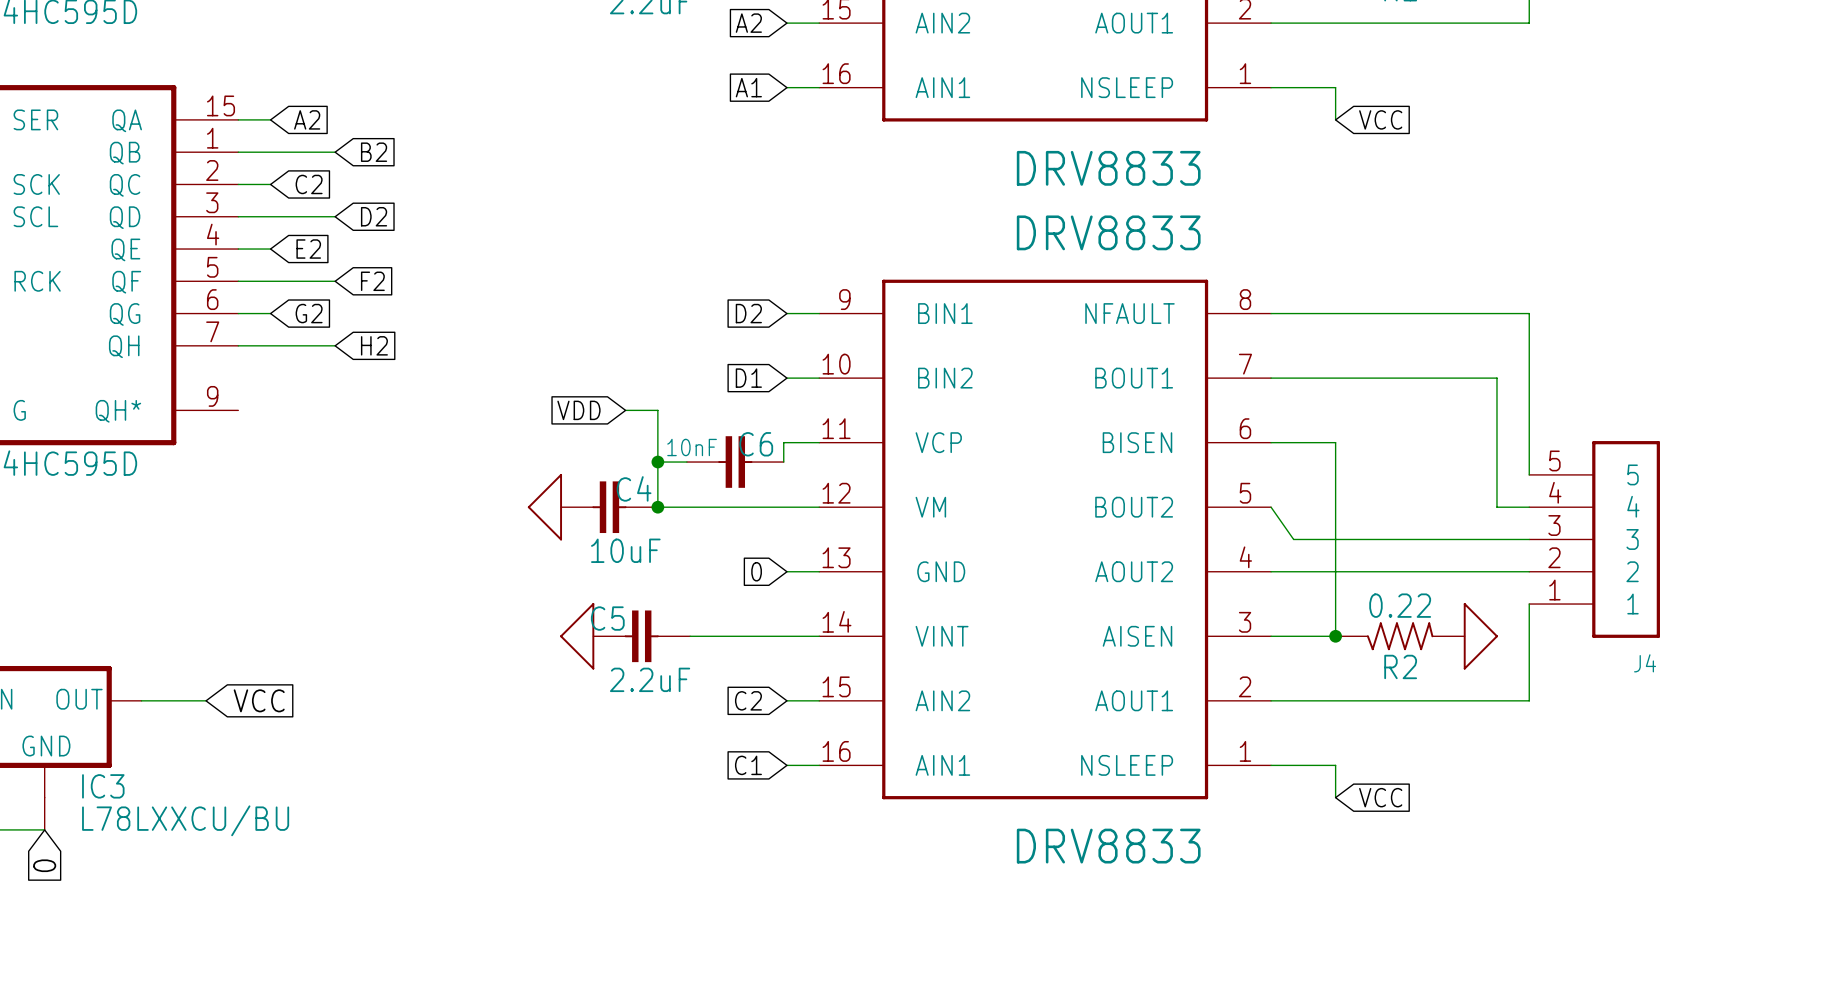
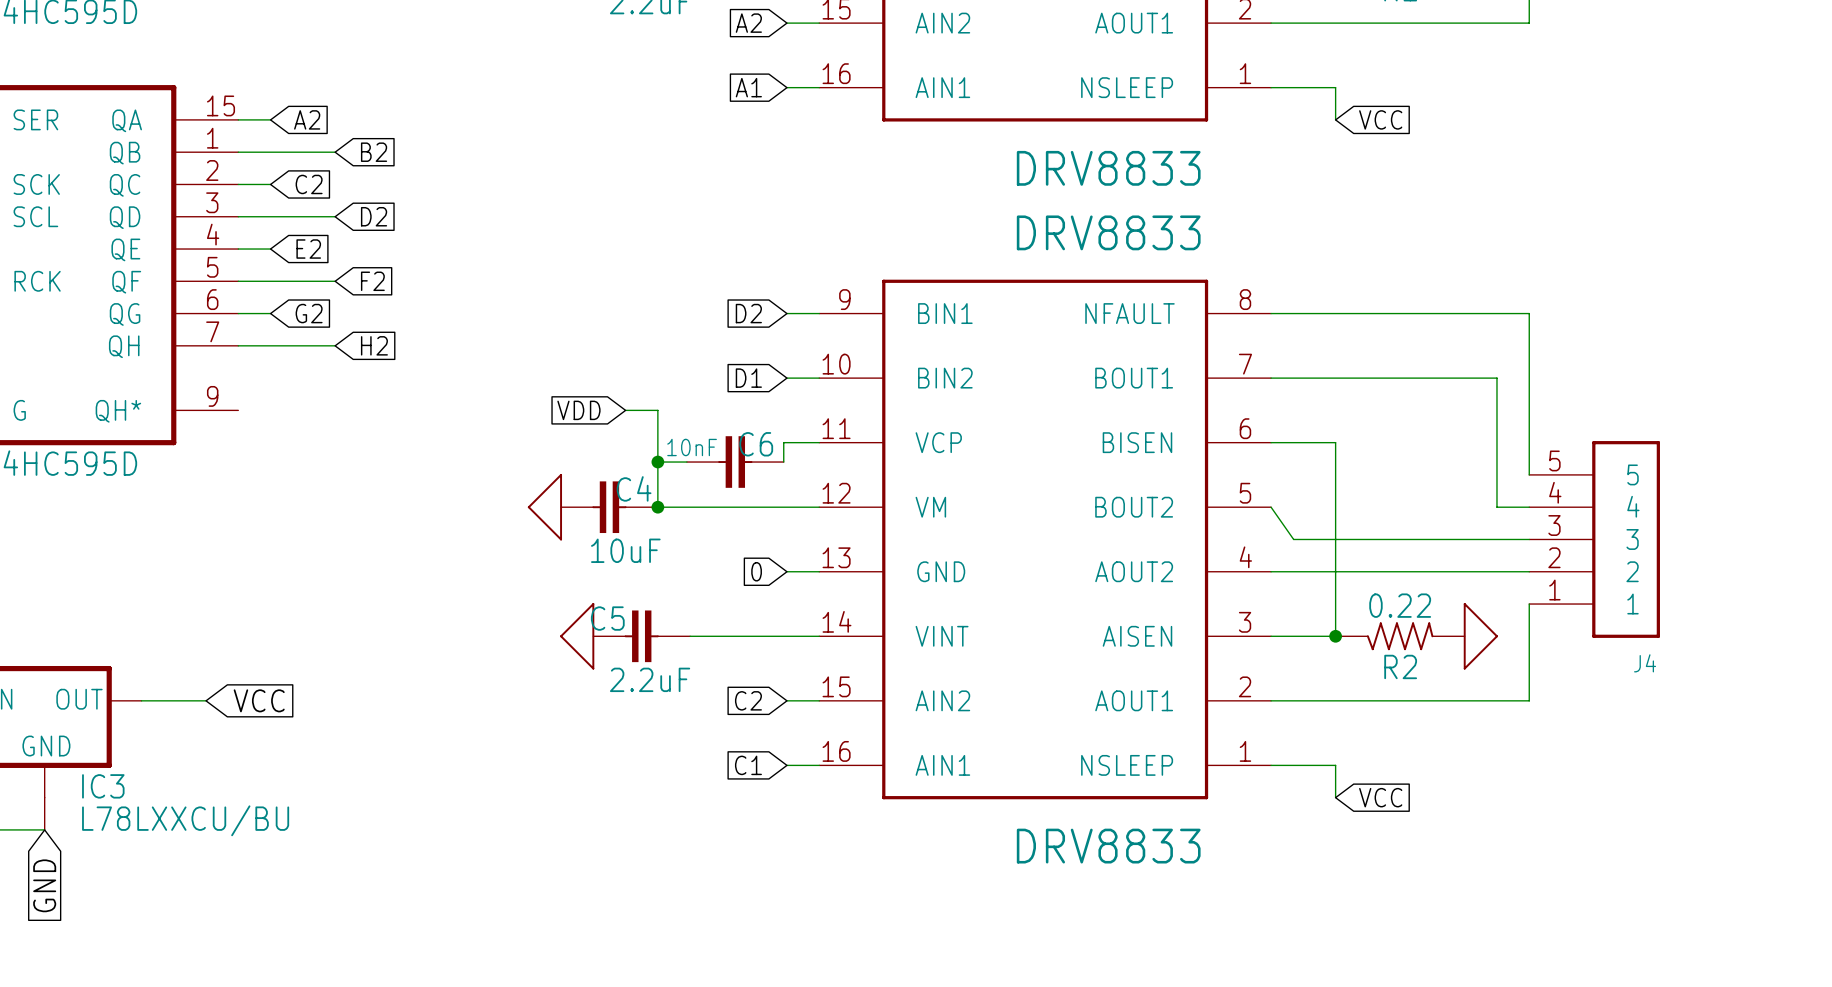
global label: 0 (44, 865) -> GND (44, 885)

